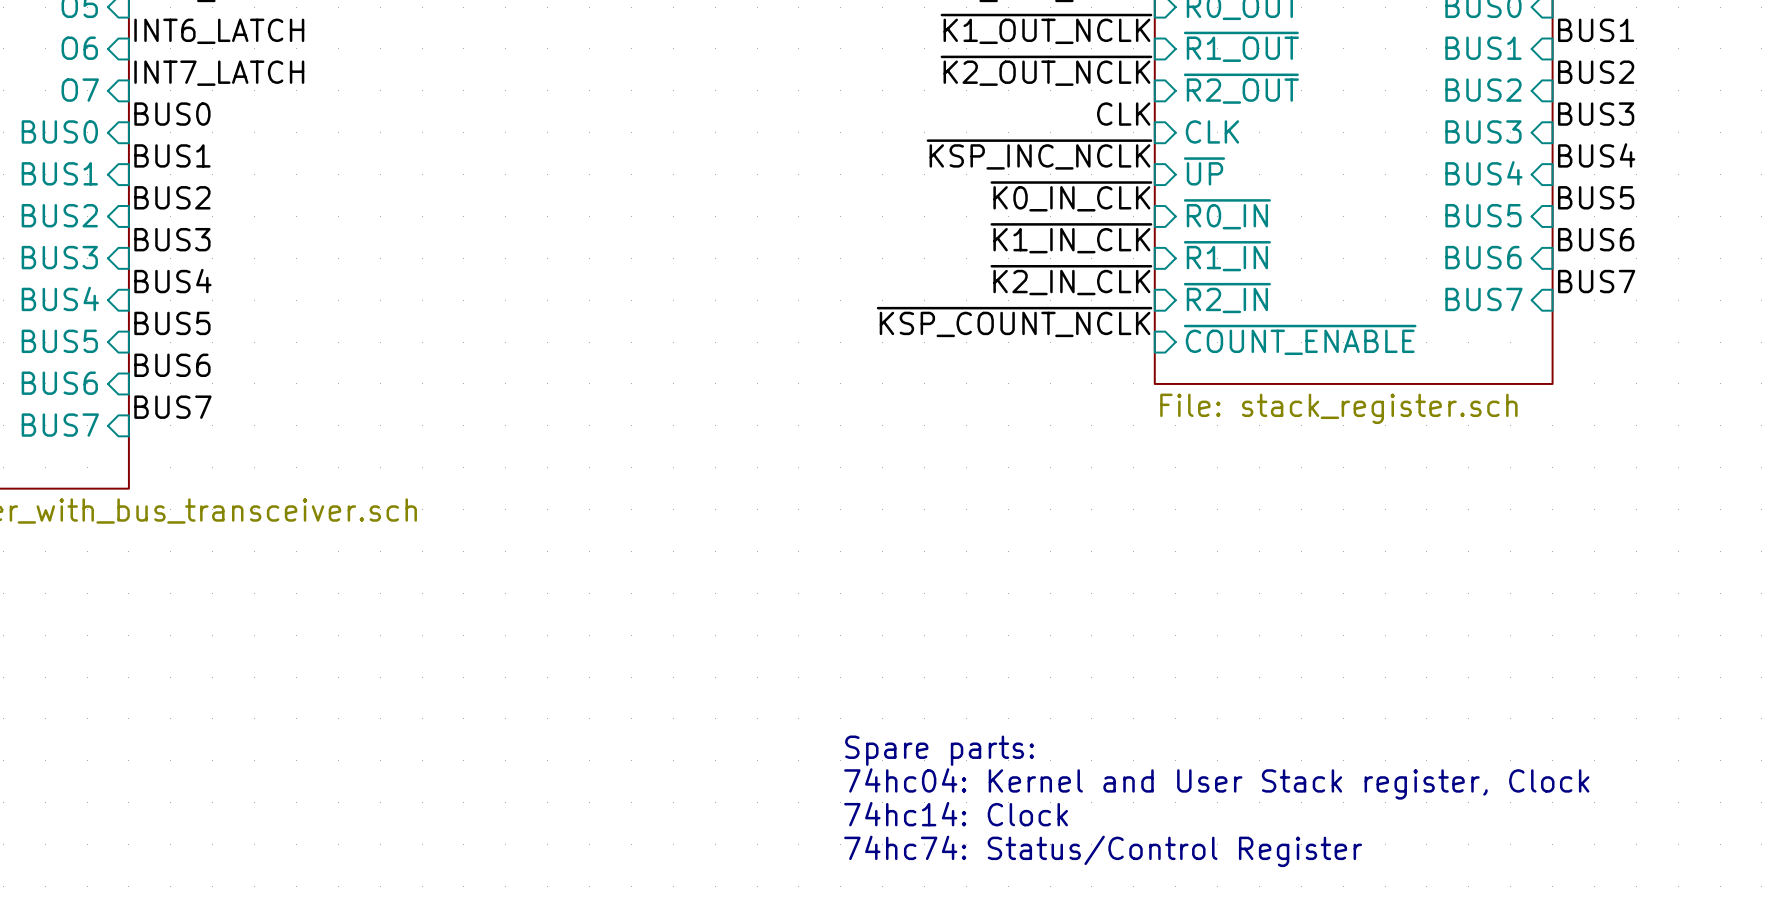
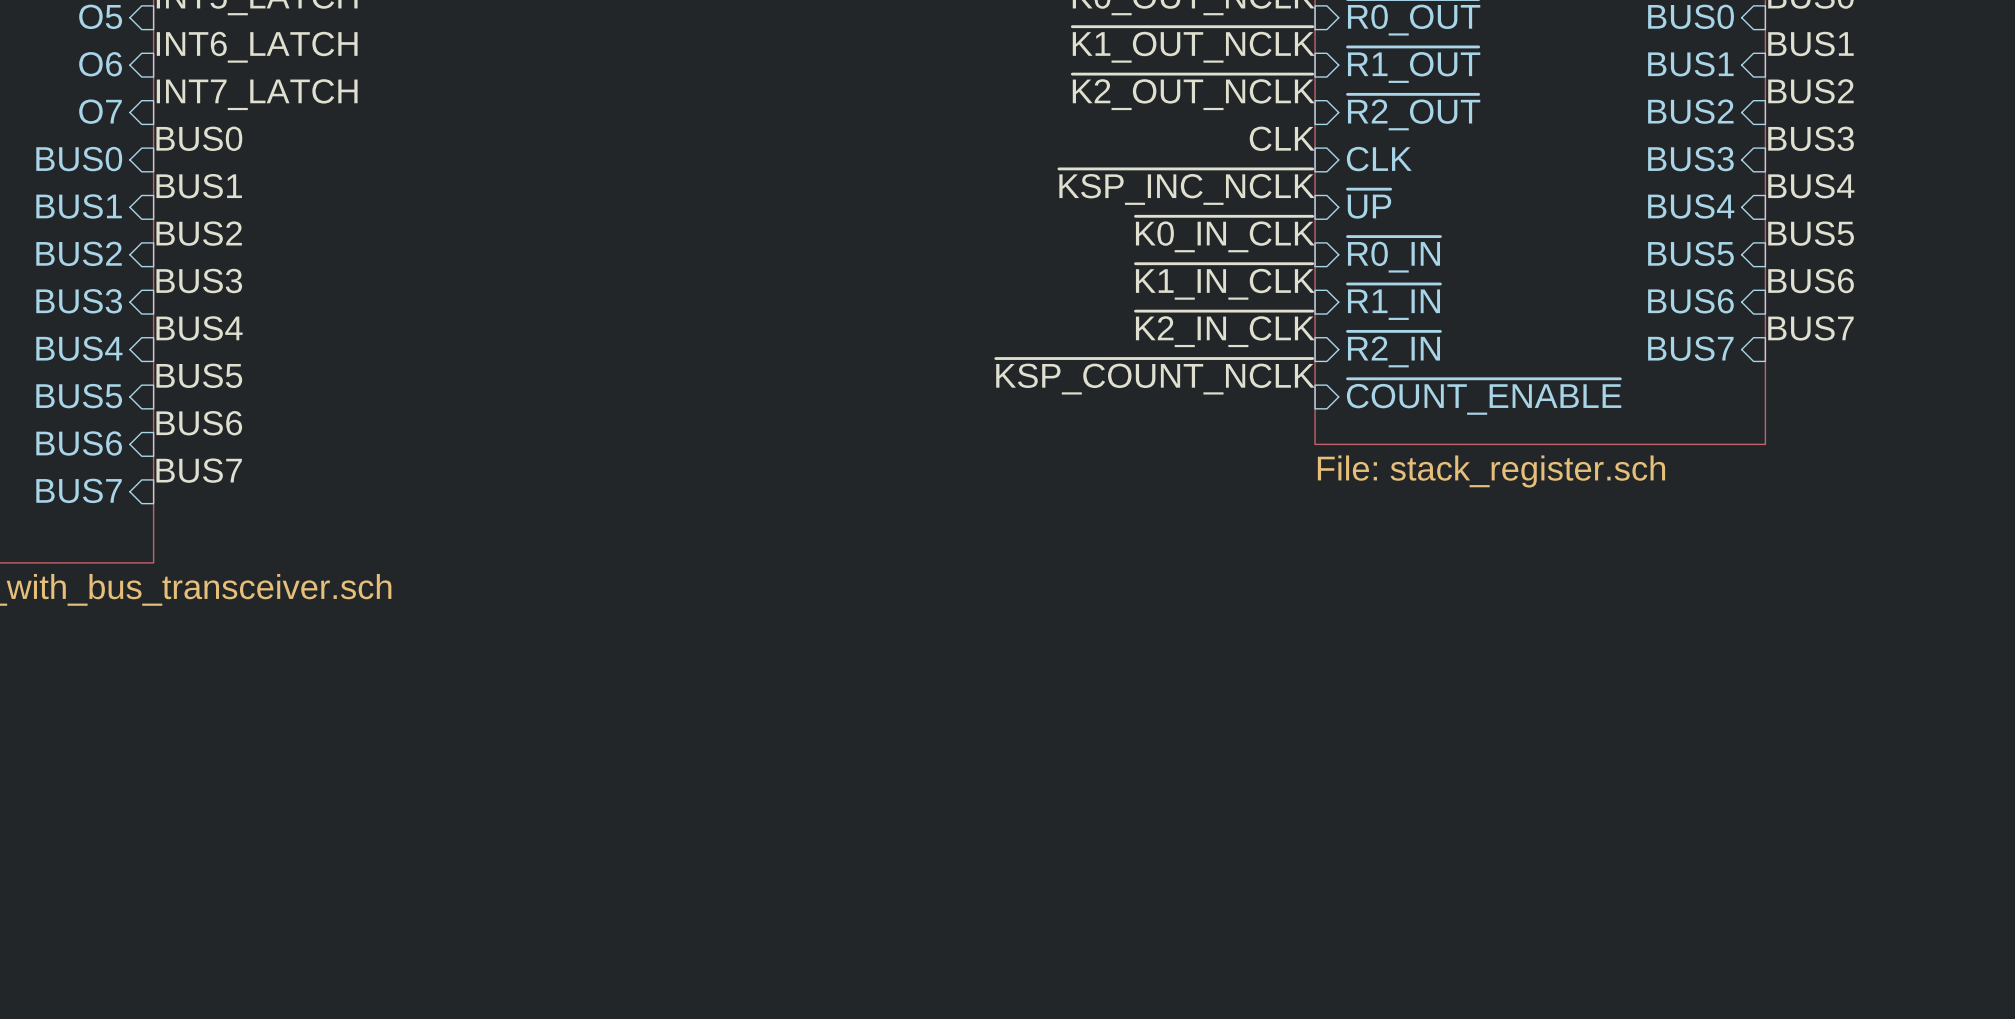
text: Spare parts: (939, 750) -> none
text: 74hc04: Kernel and User Stack register, Clock (1216, 783) -> none
text: 74hc14: Clock (956, 814) -> none
text: 74hc74: Status/Control Register (1103, 851) -> none

